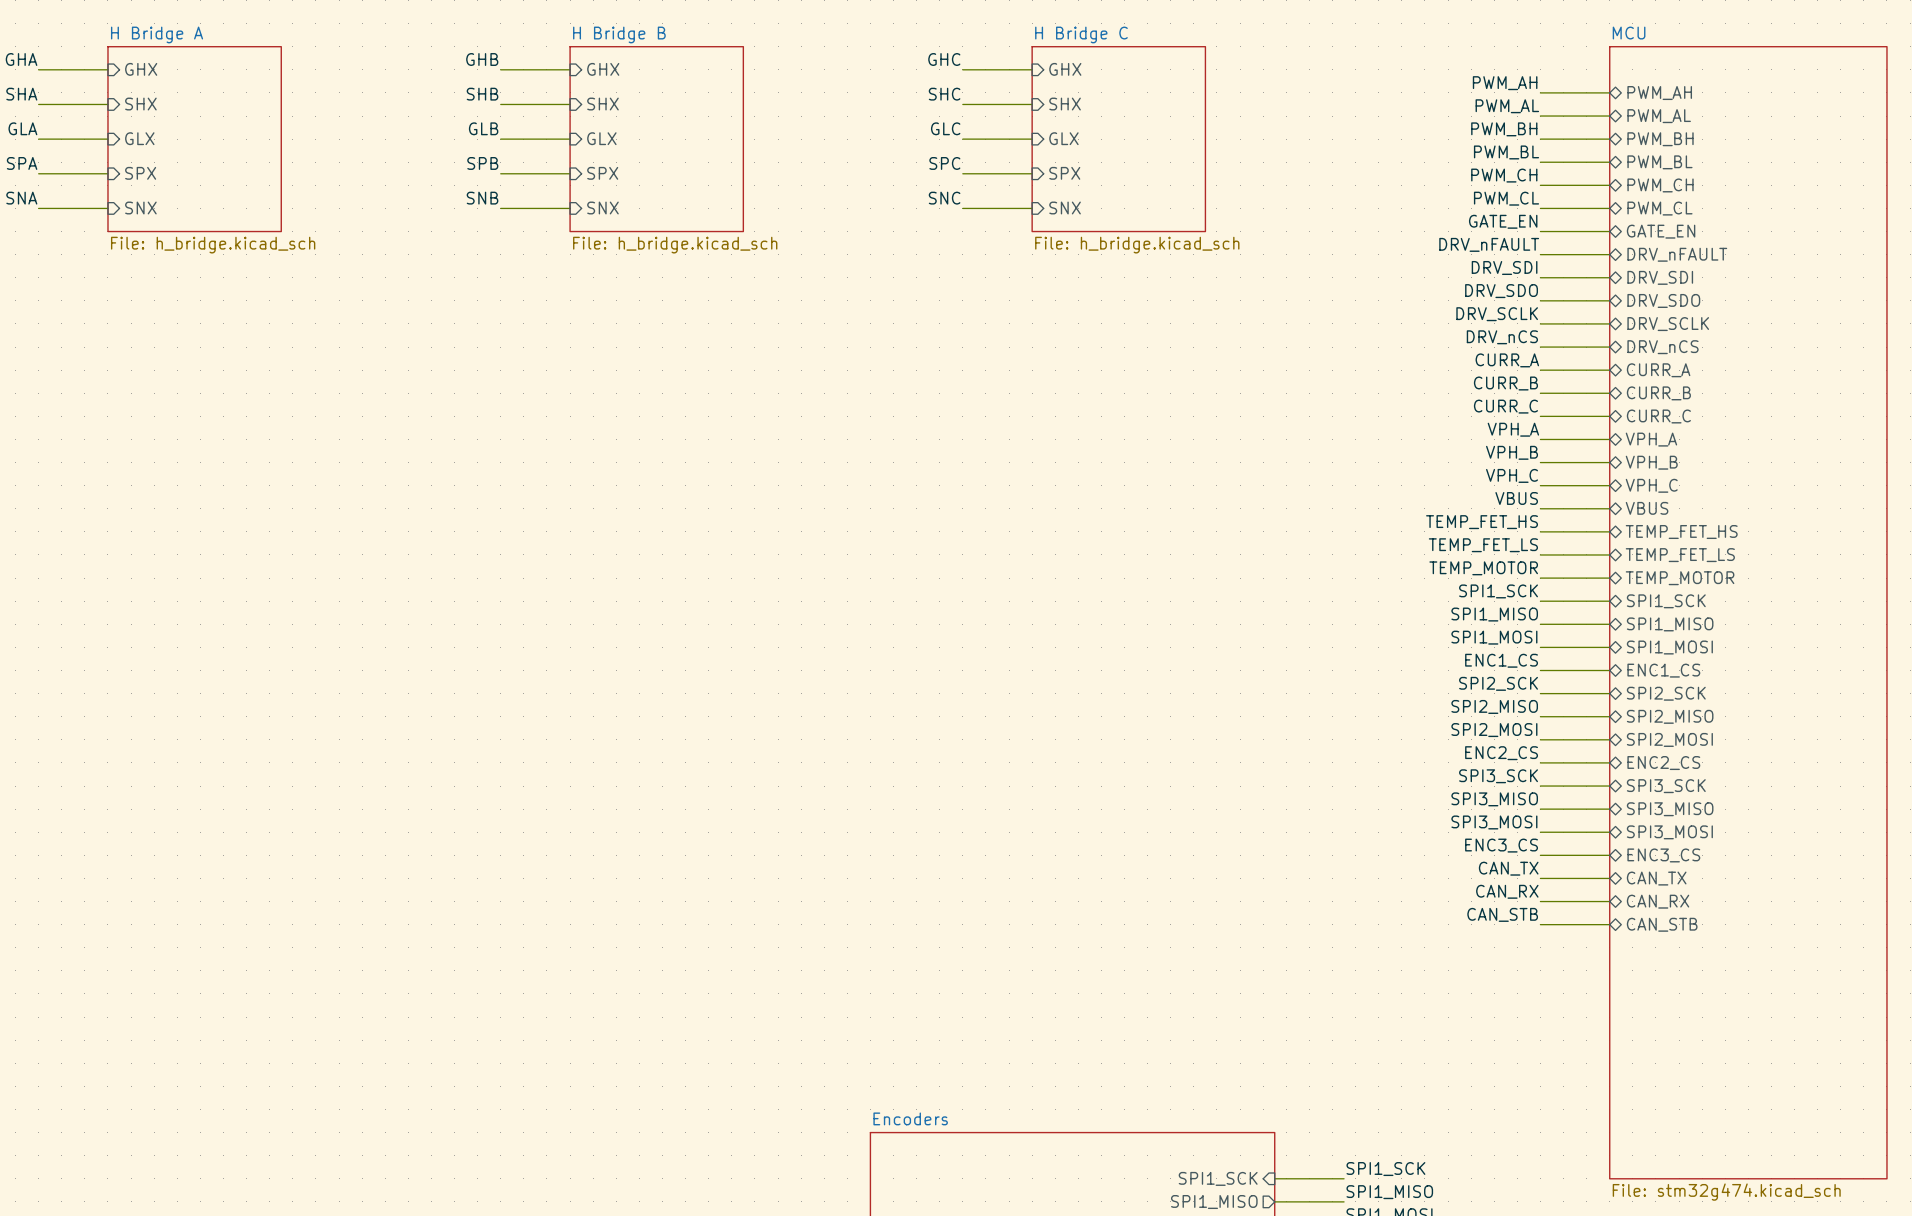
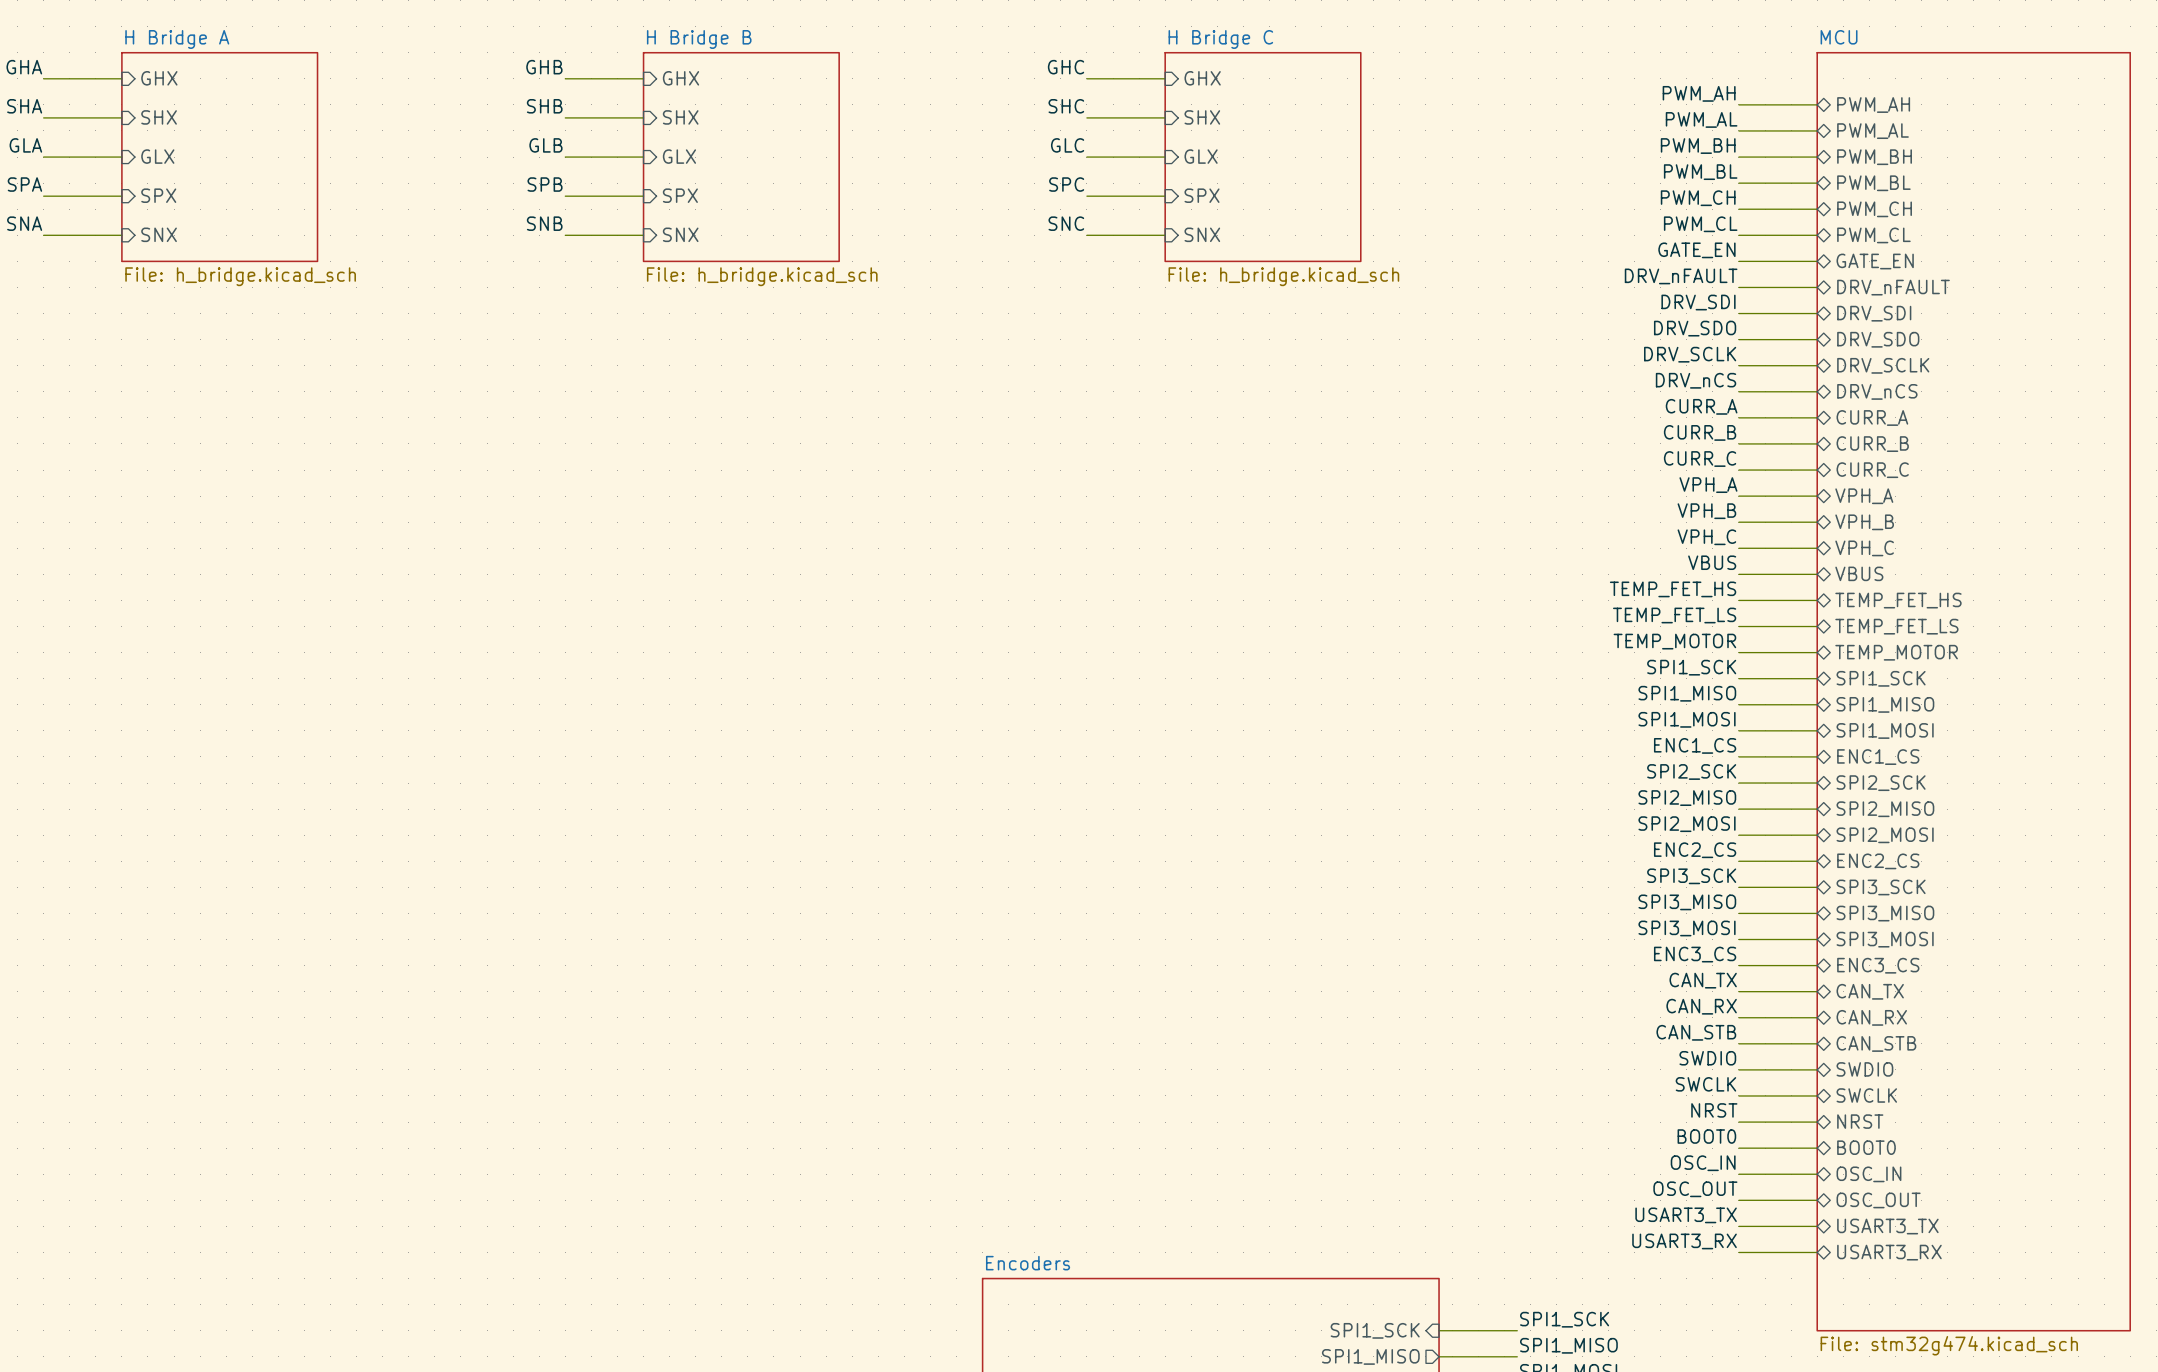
label: none -> SWDIO (1707, 1058)
wire: none -> (1738, 1069) (1817, 1069)
sheet pin: none -> SWDIO (1864, 1069)
label: none -> SWCLK (1705, 1084)
wire: none -> (1738, 1095) (1817, 1095)
sheet pin: none -> SWCLK (1866, 1095)
label: none -> NRST (1714, 1110)
wire: none -> (1738, 1122) (1817, 1122)
sheet pin: none -> NRST (1860, 1121)
label: none -> BOOT0 (1706, 1136)
sheet pin: none -> BOOT0 (1866, 1147)
wire: none -> (1738, 1148) (1817, 1148)
label: none -> OSC_IN (1703, 1163)
wire: none -> (1738, 1174) (1817, 1174)
sheet pin: none -> OSC_IN (1868, 1174)
label: none -> OSC_OUT (1695, 1189)
wire: none -> (1738, 1200) (1817, 1200)
sheet pin: none -> OSC_OUT (1878, 1200)
label: none -> USART3_TX (1686, 1215)
wire: none -> (1738, 1226) (1817, 1226)
sheet pin: none -> USART3_TX (1887, 1226)
label: none -> USART3_RX (1684, 1241)
wire: none -> (1738, 1252) (1817, 1252)
sheet pin: none -> USART3_RX (1889, 1252)

